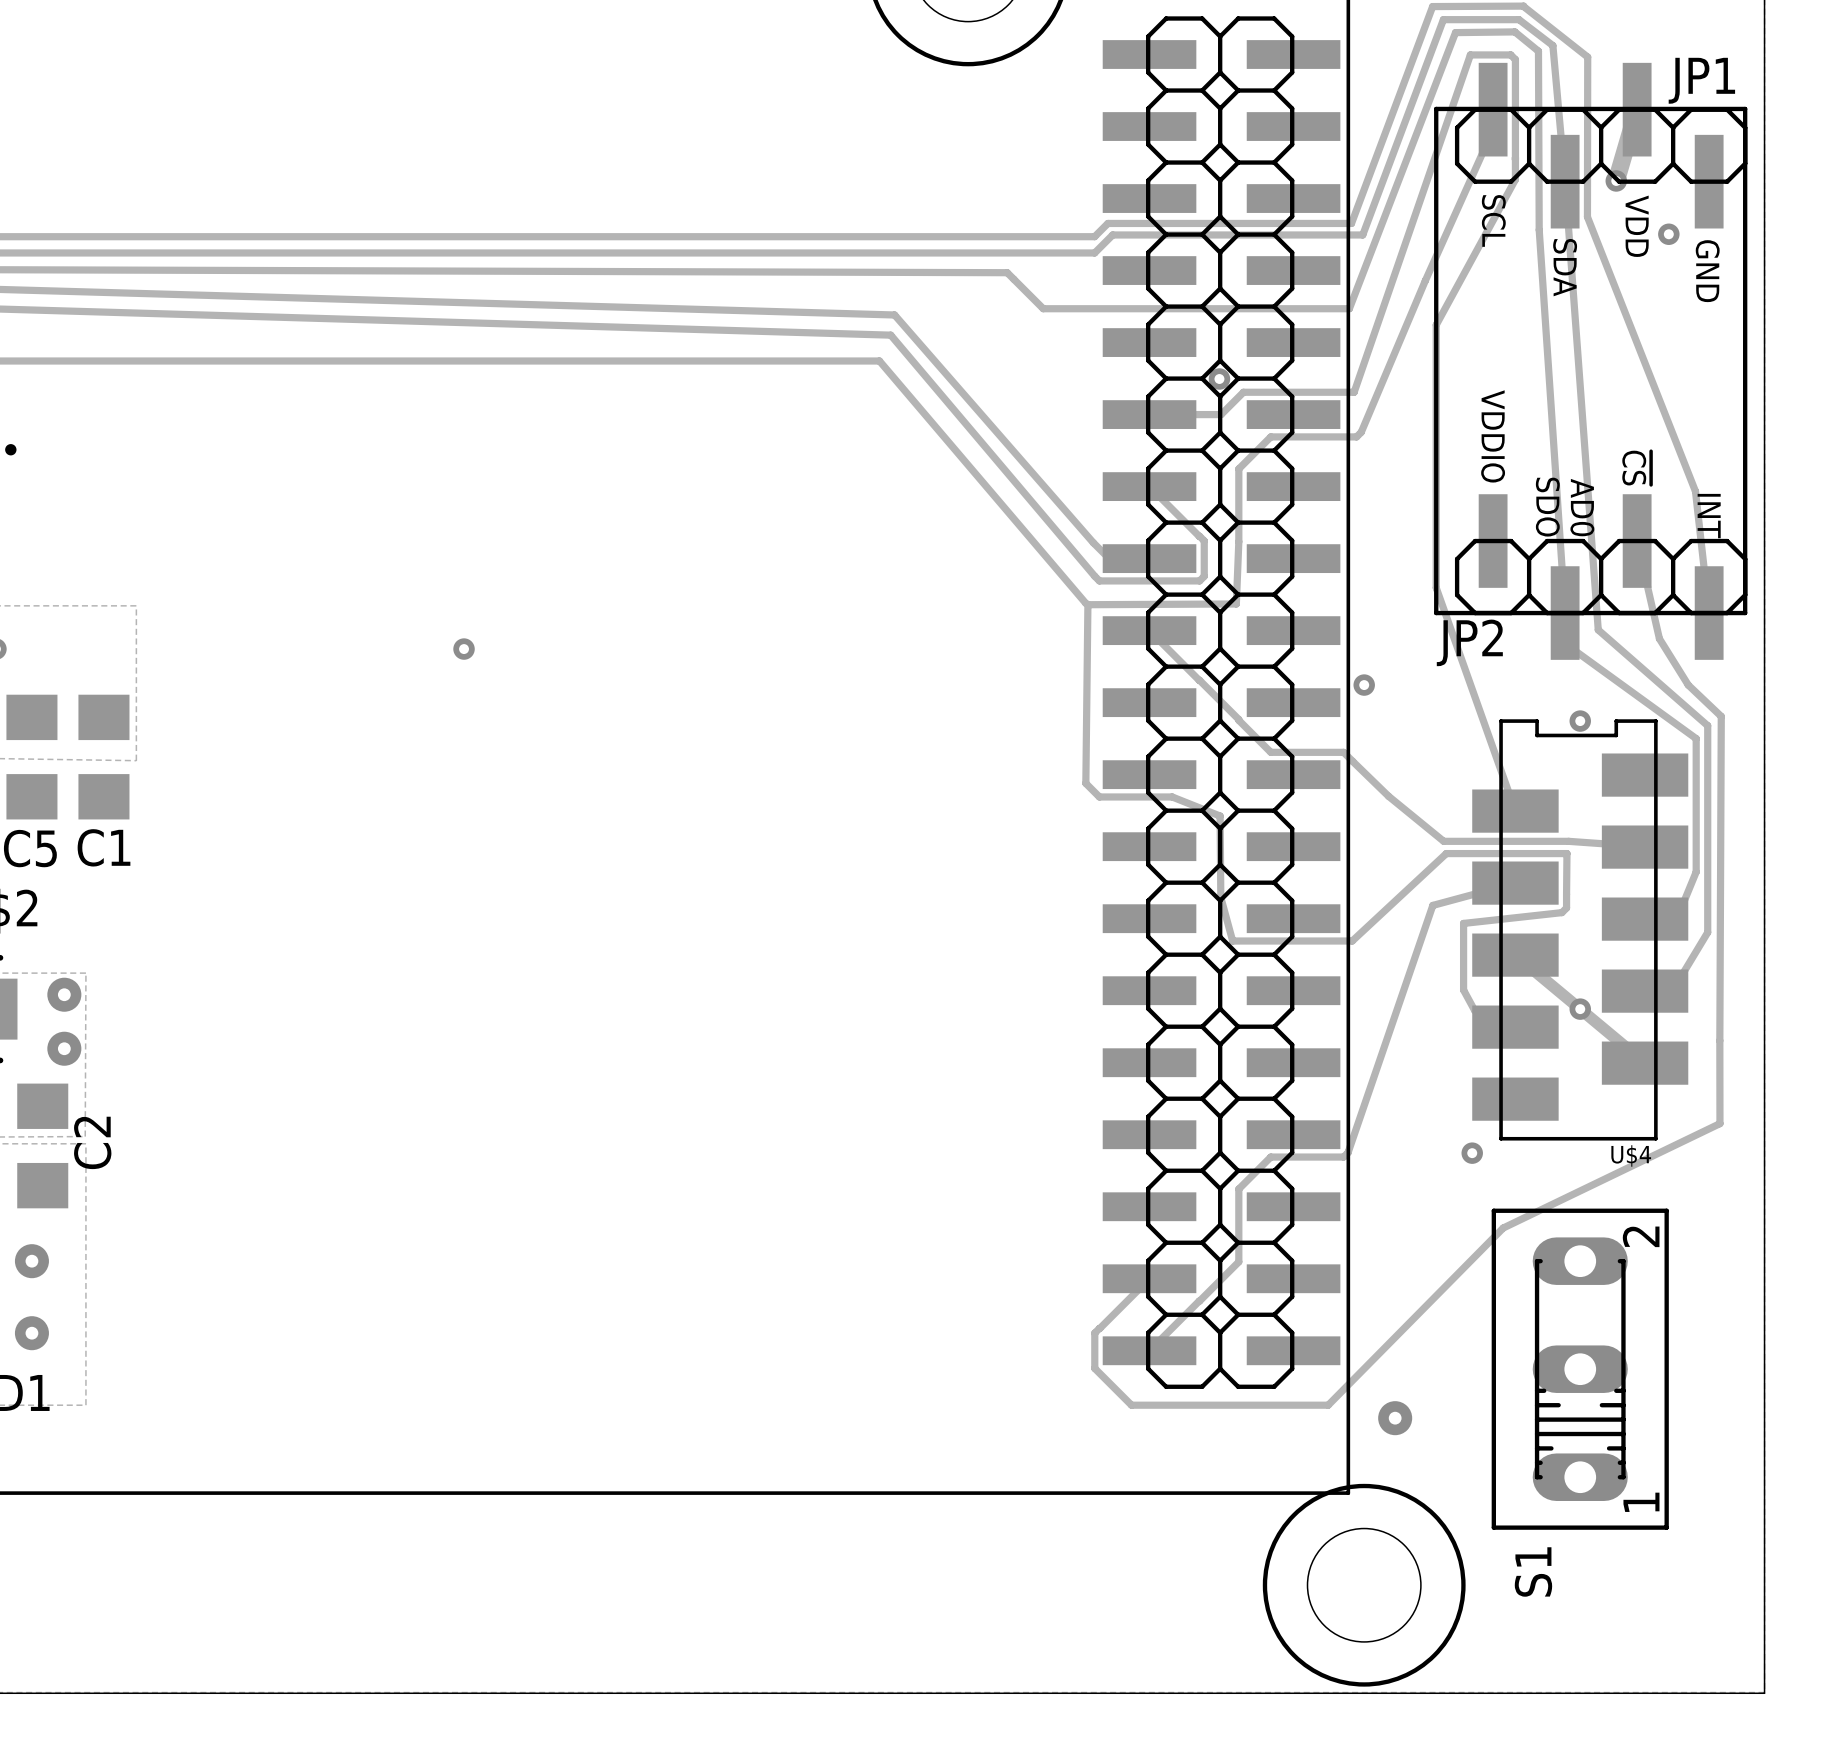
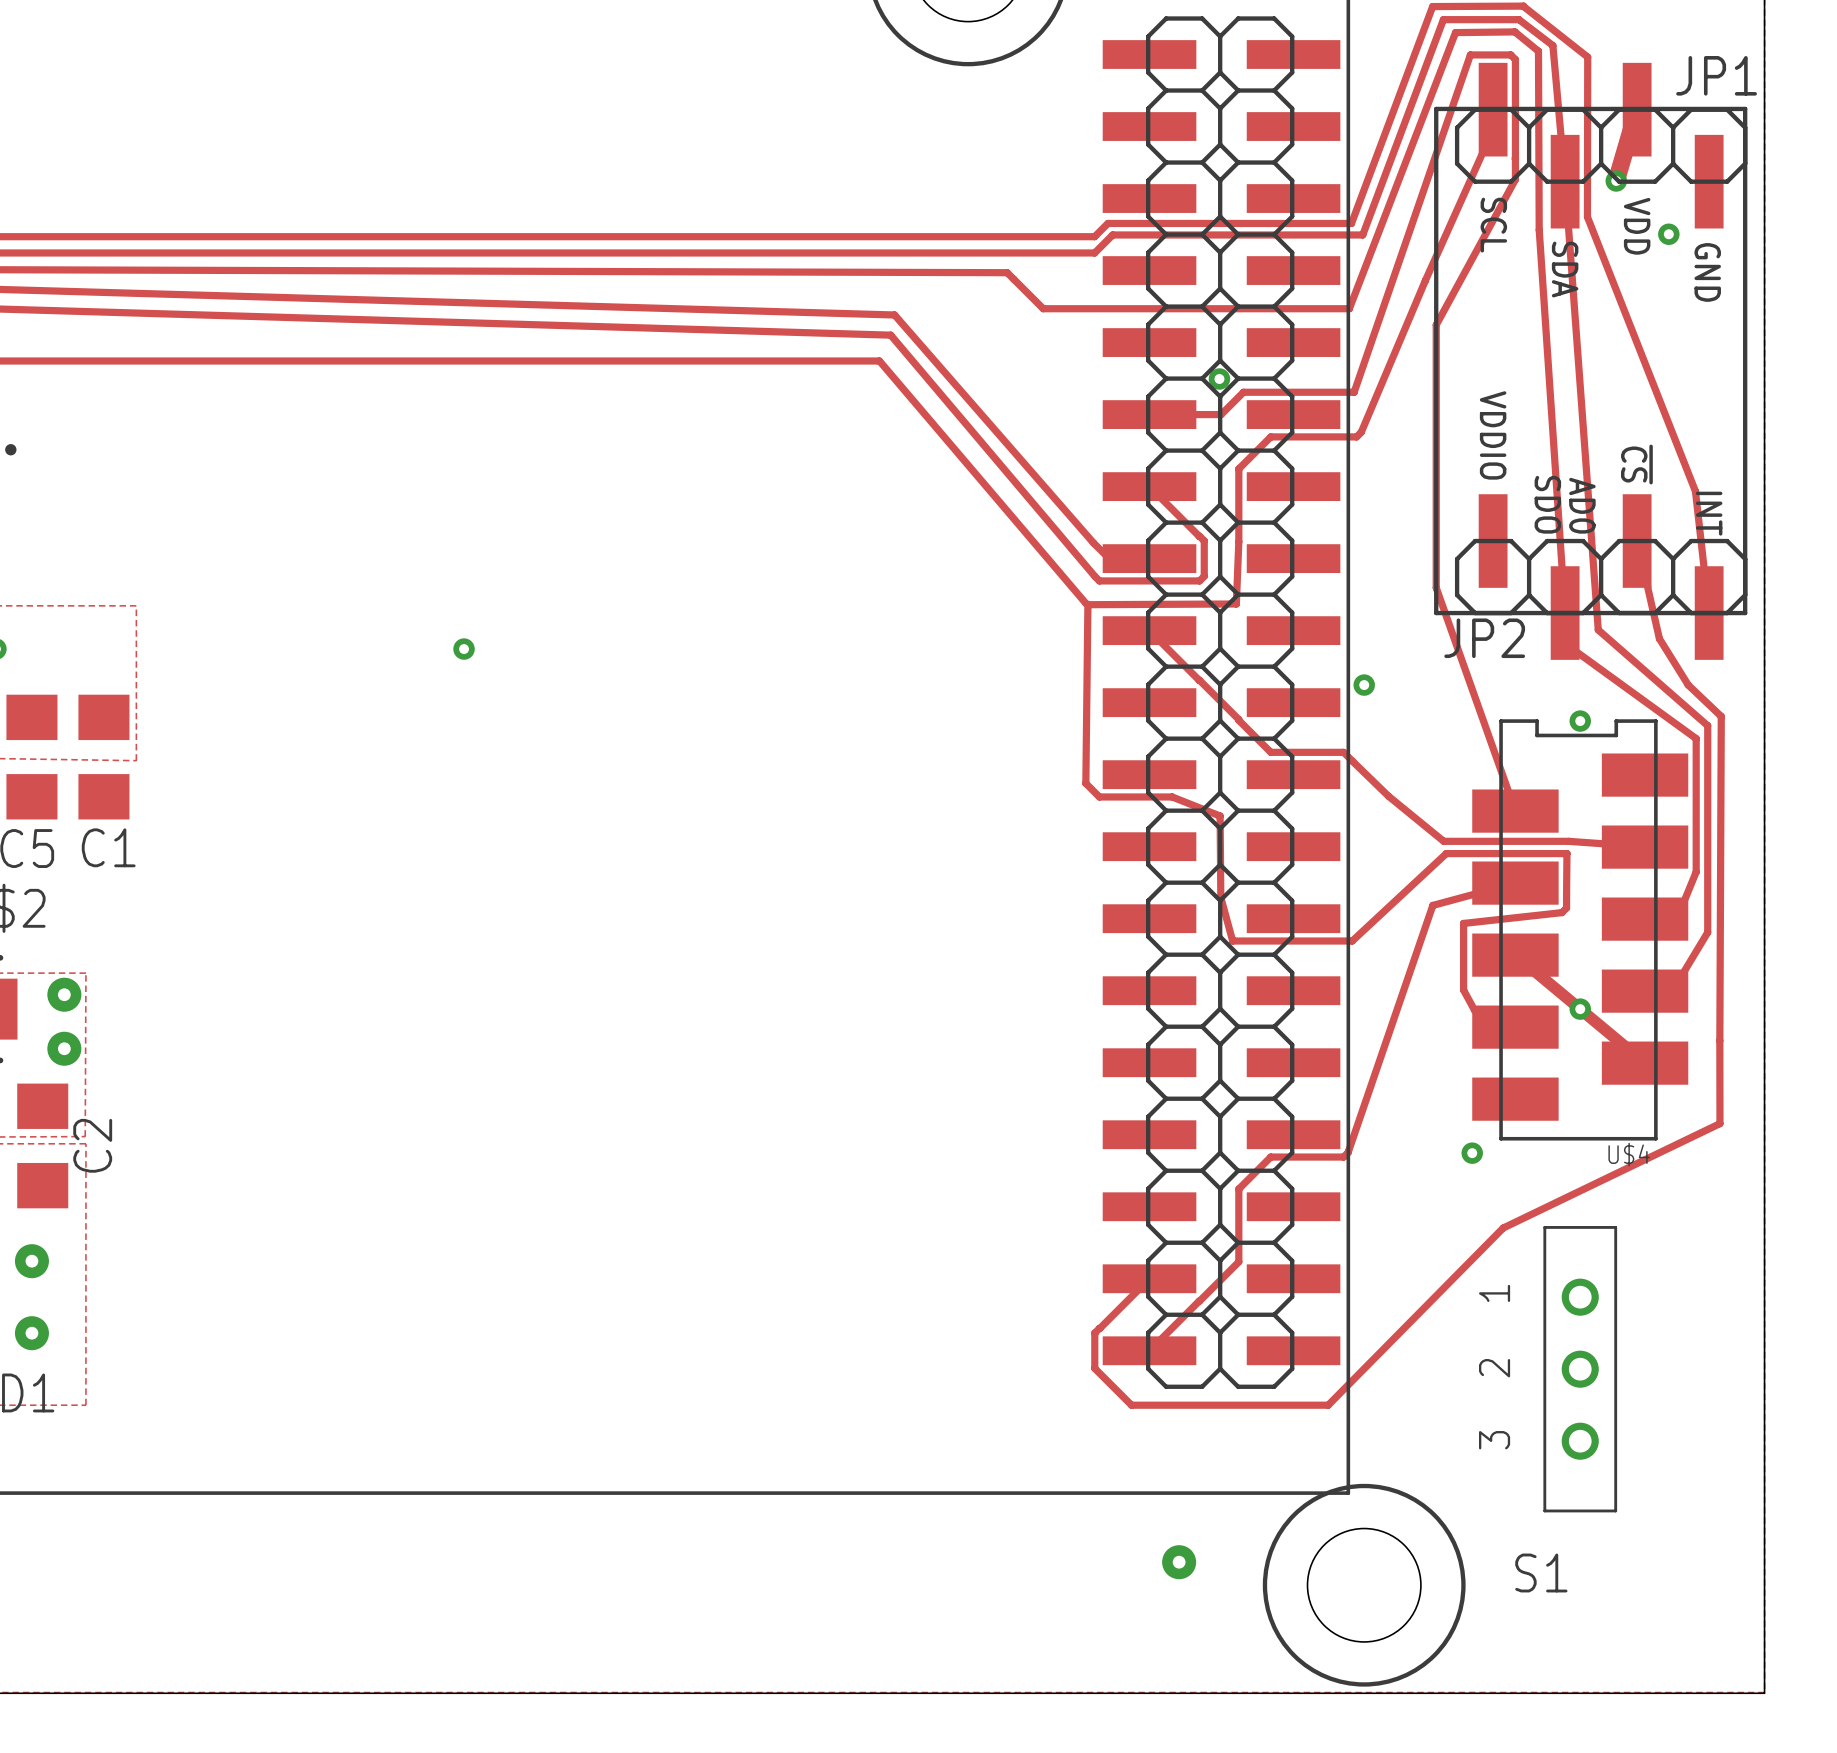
S1 footprint: [1491, 1208, 1669, 1530] -> [1543, 1226, 1618, 1513]
text: none -> 1 (1494, 1293)
text: none -> 2 (1494, 1368)
via: (1395, 1418) -> none
text: none -> 3 (1494, 1440)
via: none -> (1179, 1562)

